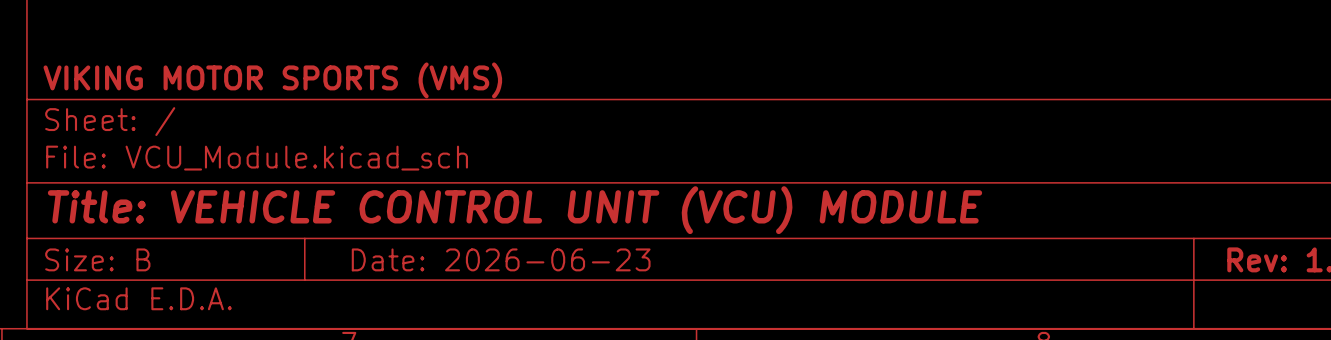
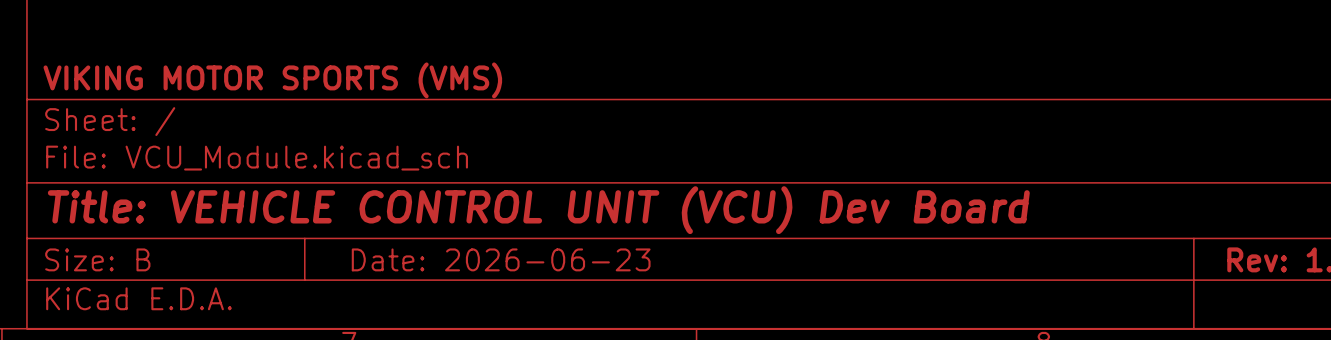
title block: Title: VEHICLE CONTROL UNIT (VCU) MODULE (515, 210) -> Title: VEHICLE CONTROL UNIT (VCU) Dev Board (538, 210)

